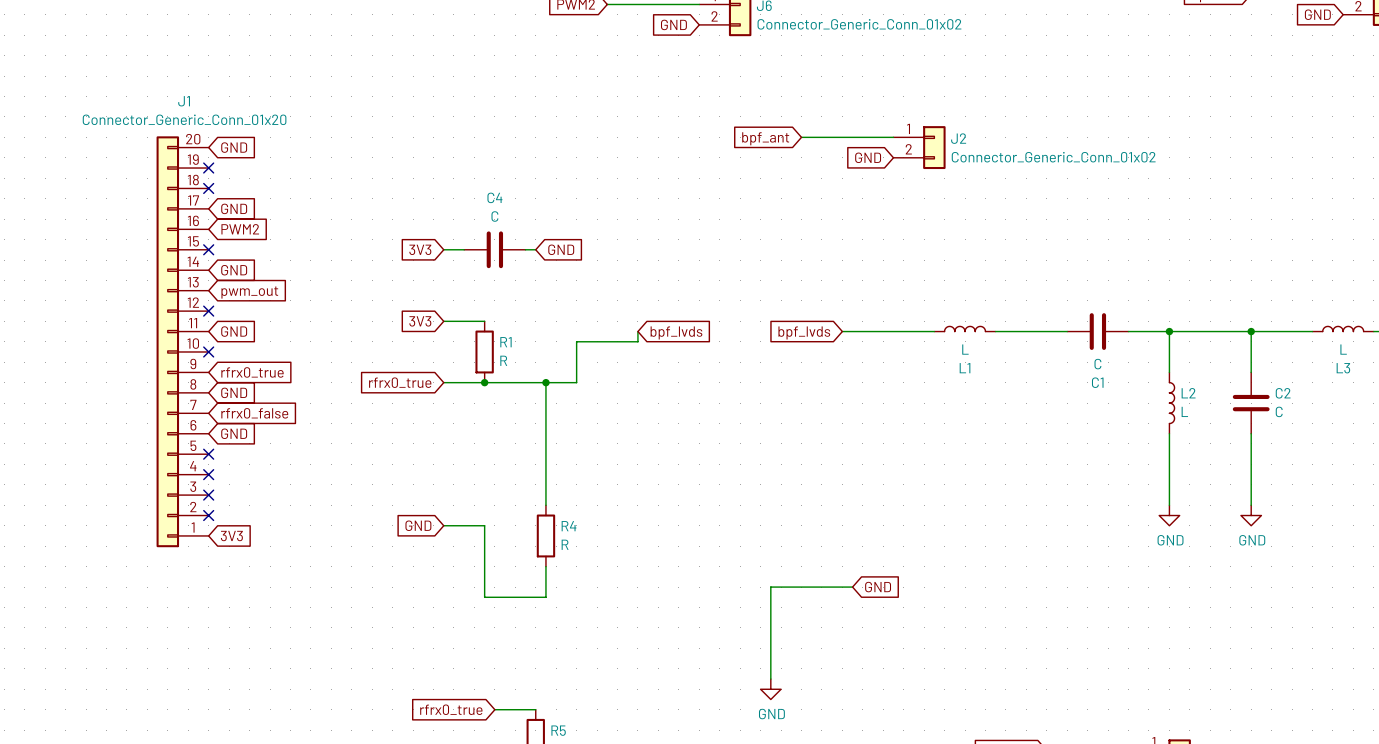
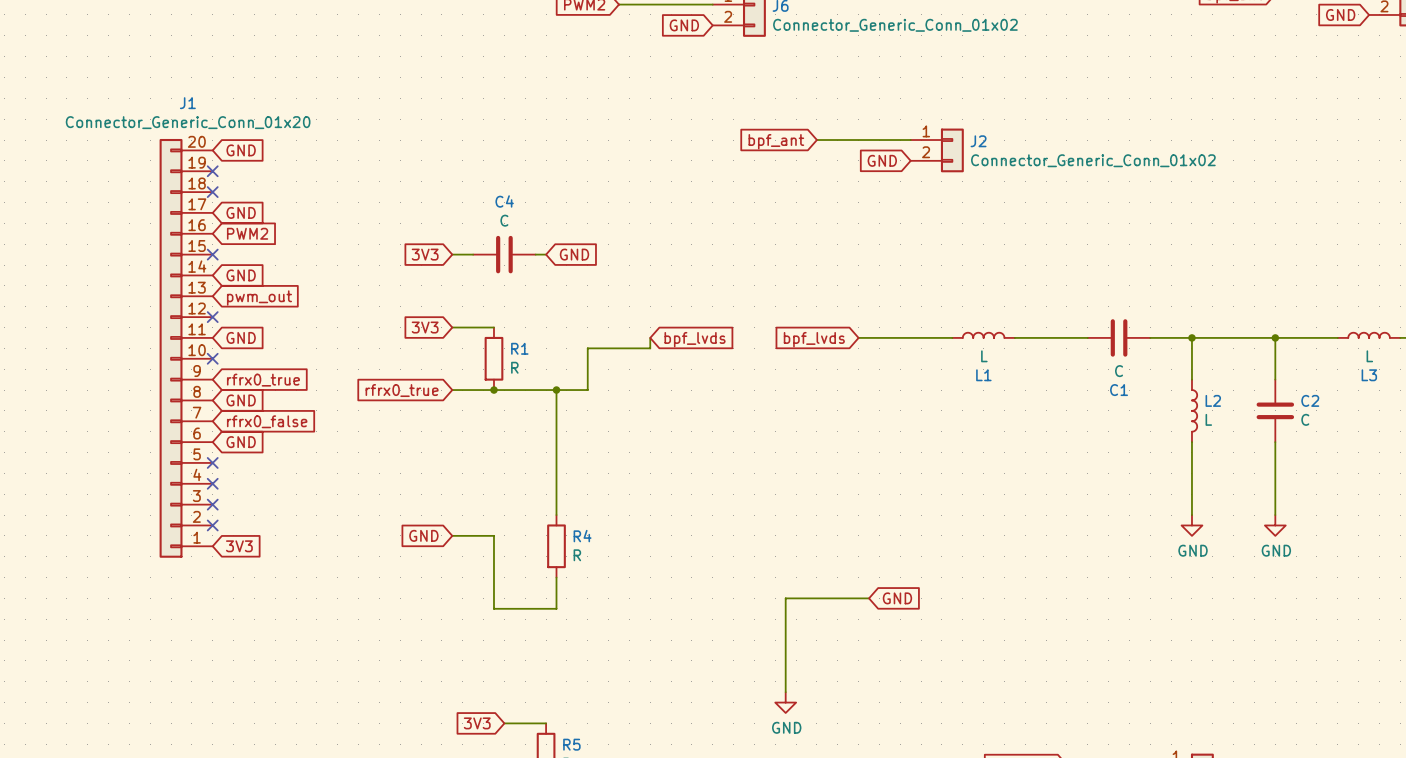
global label: rfrx0_true (451, 709) -> 3V3 (477, 723)

